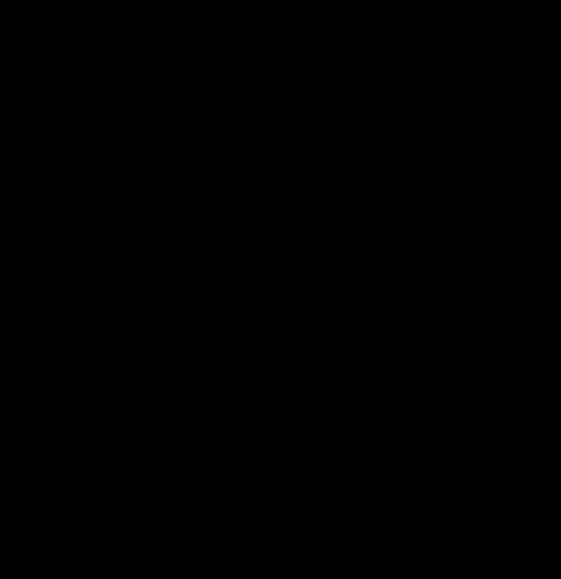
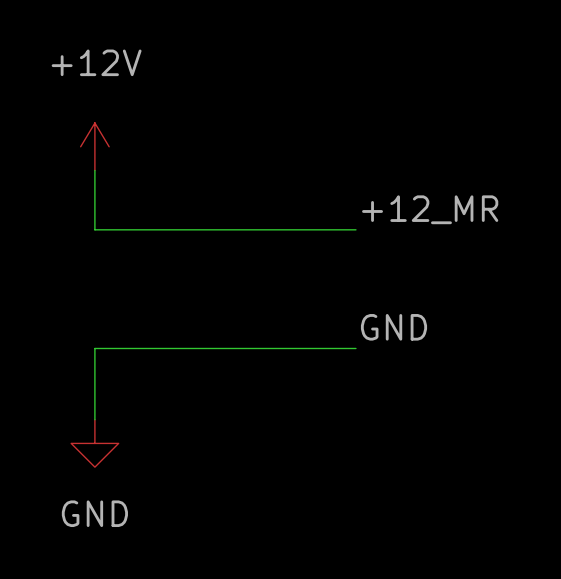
power symbol: none -> +12V (94, 146)
wire: none -> (94, 170) (94, 229) (355, 229)
label: none -> +12_MR (430, 209)
label: none -> GND (394, 327)
wire: none -> (355, 348) (94, 348) (94, 419)
power symbol: none -> GND (94, 443)

